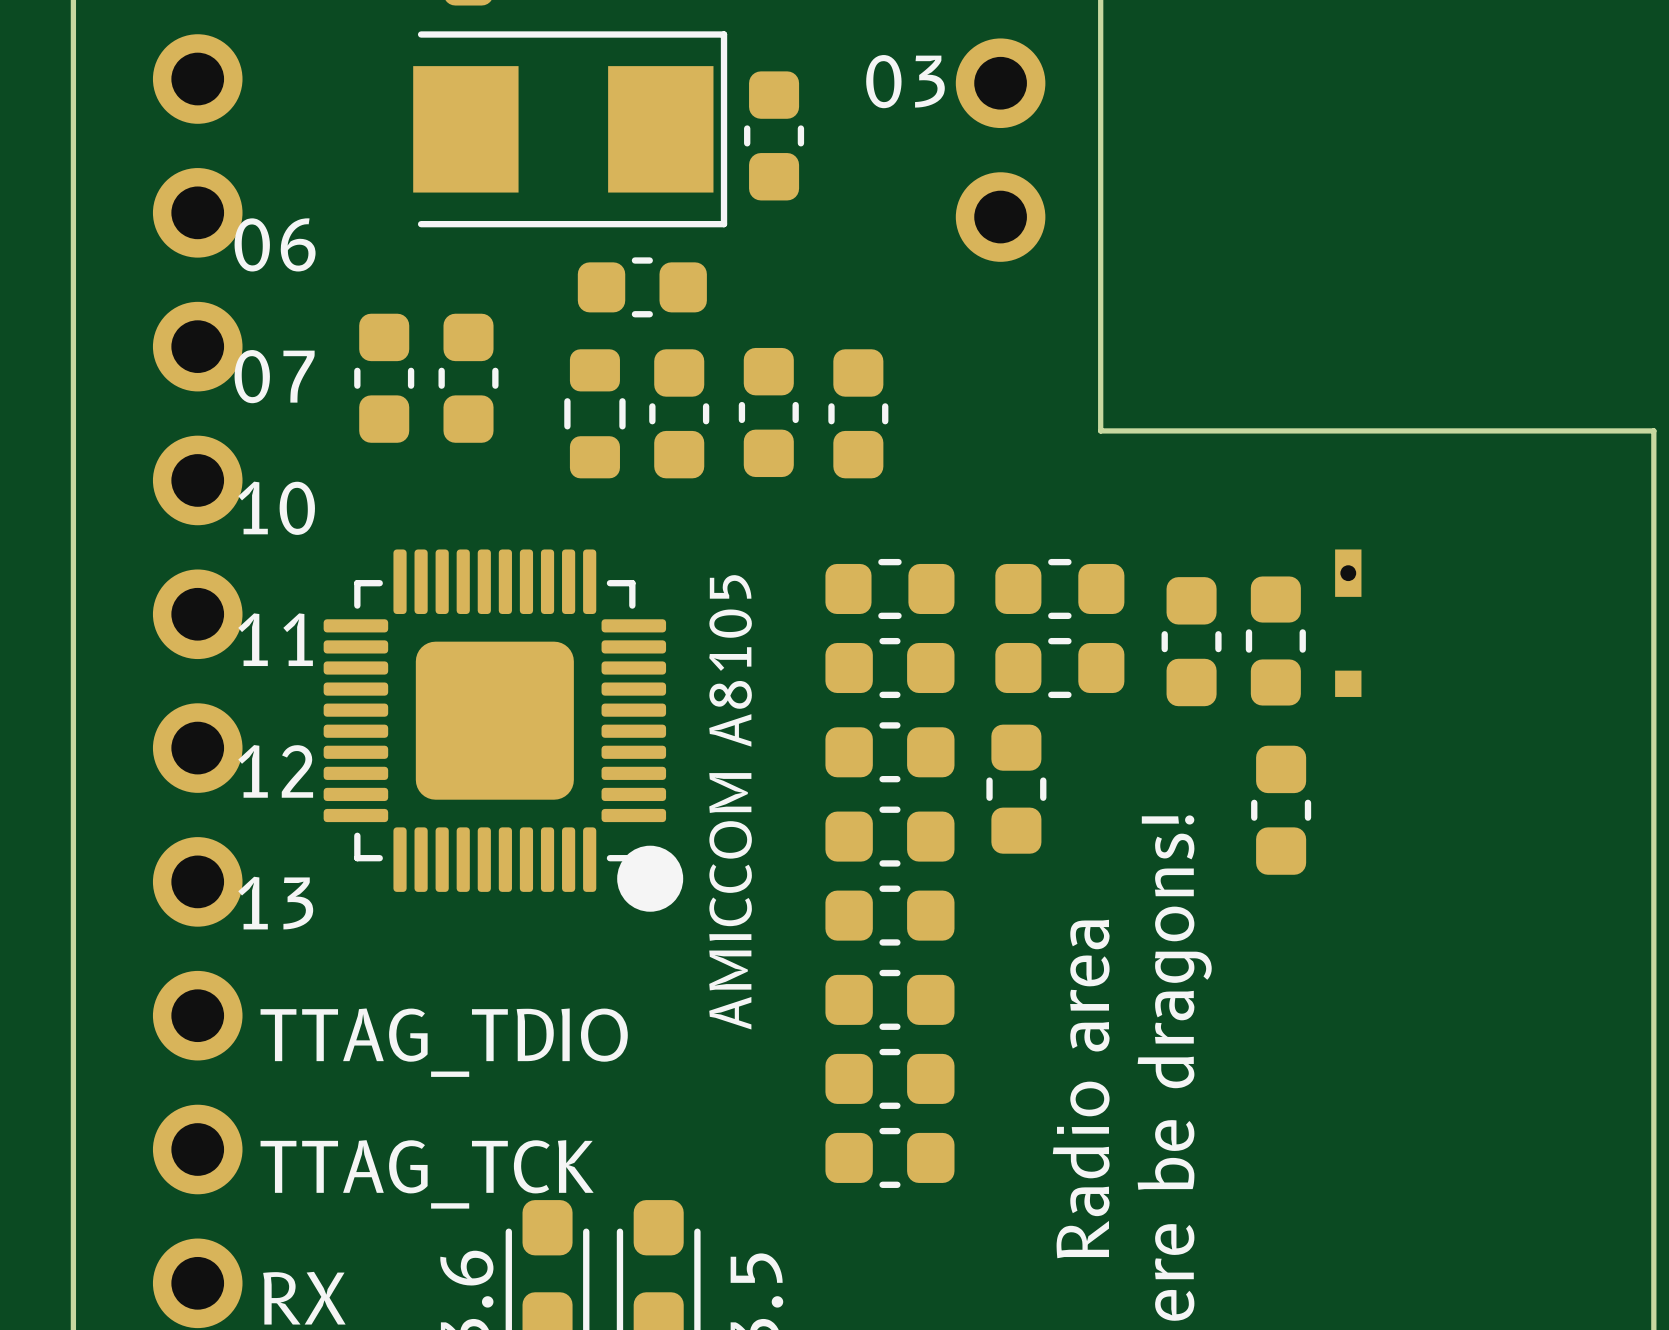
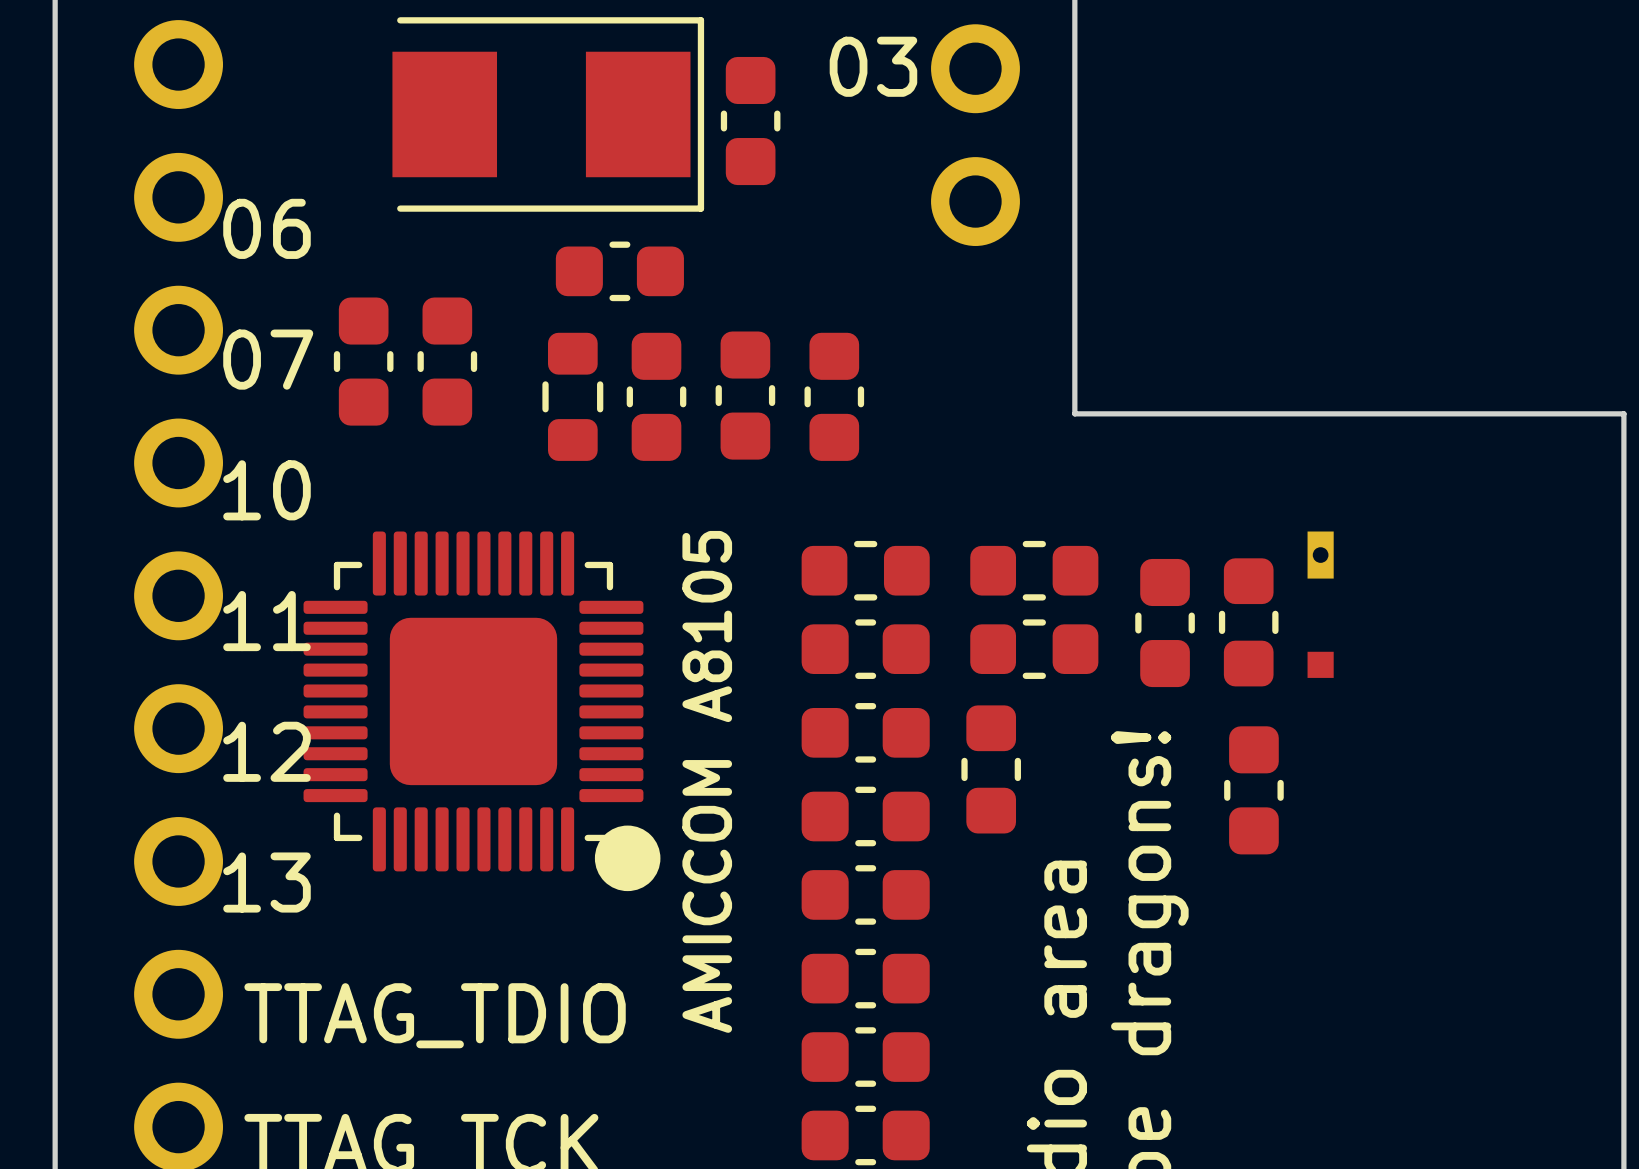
part footprint: [323, 549, 667, 892] -> [303, 531, 644, 872]

